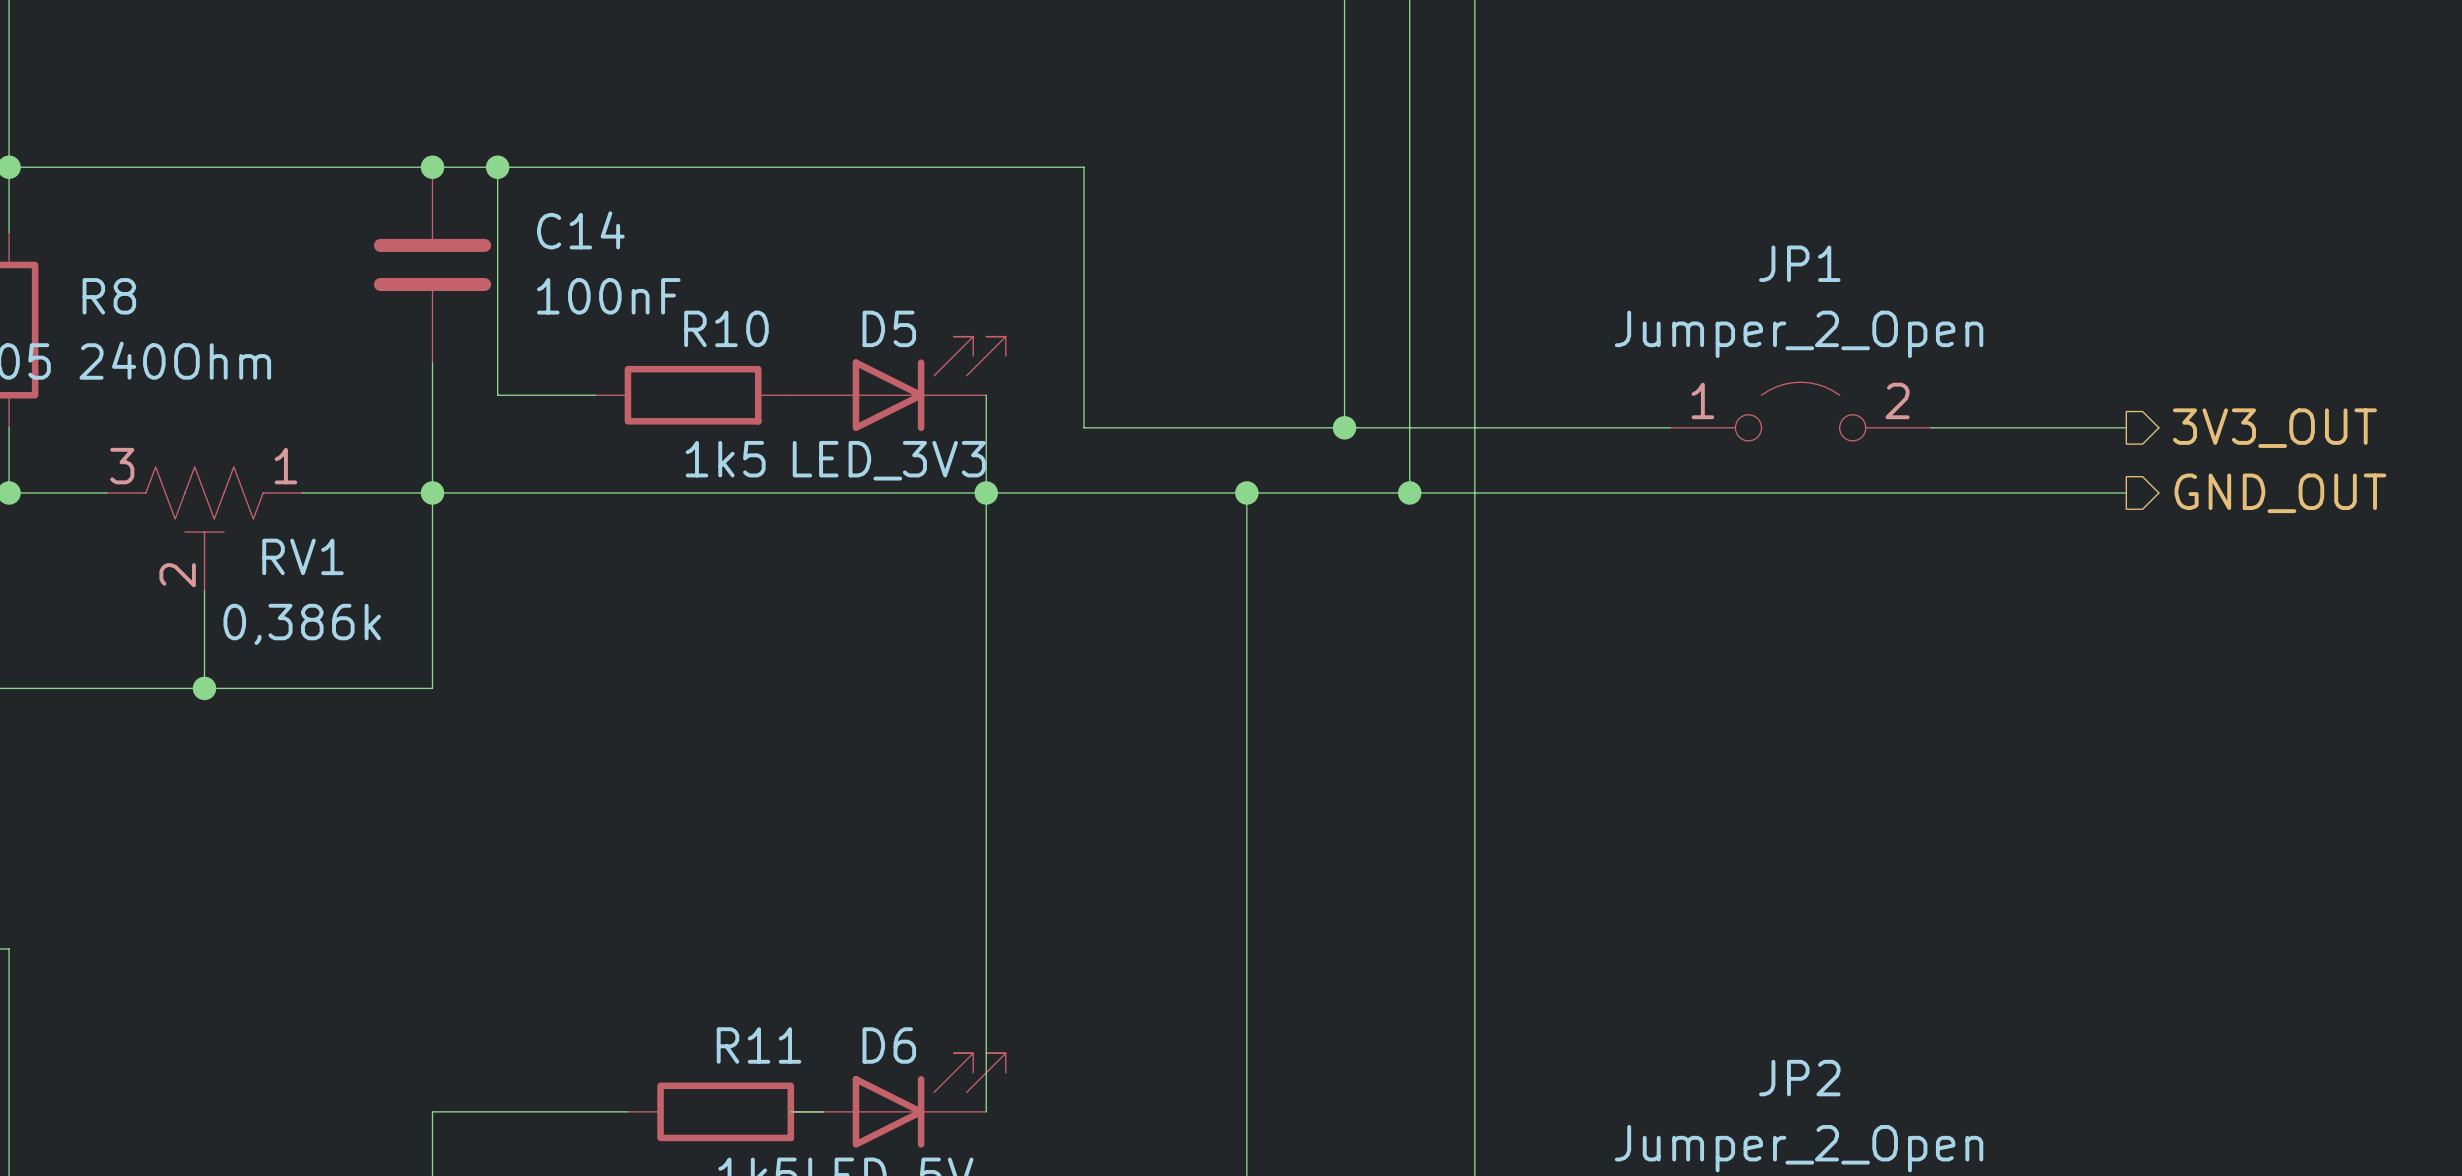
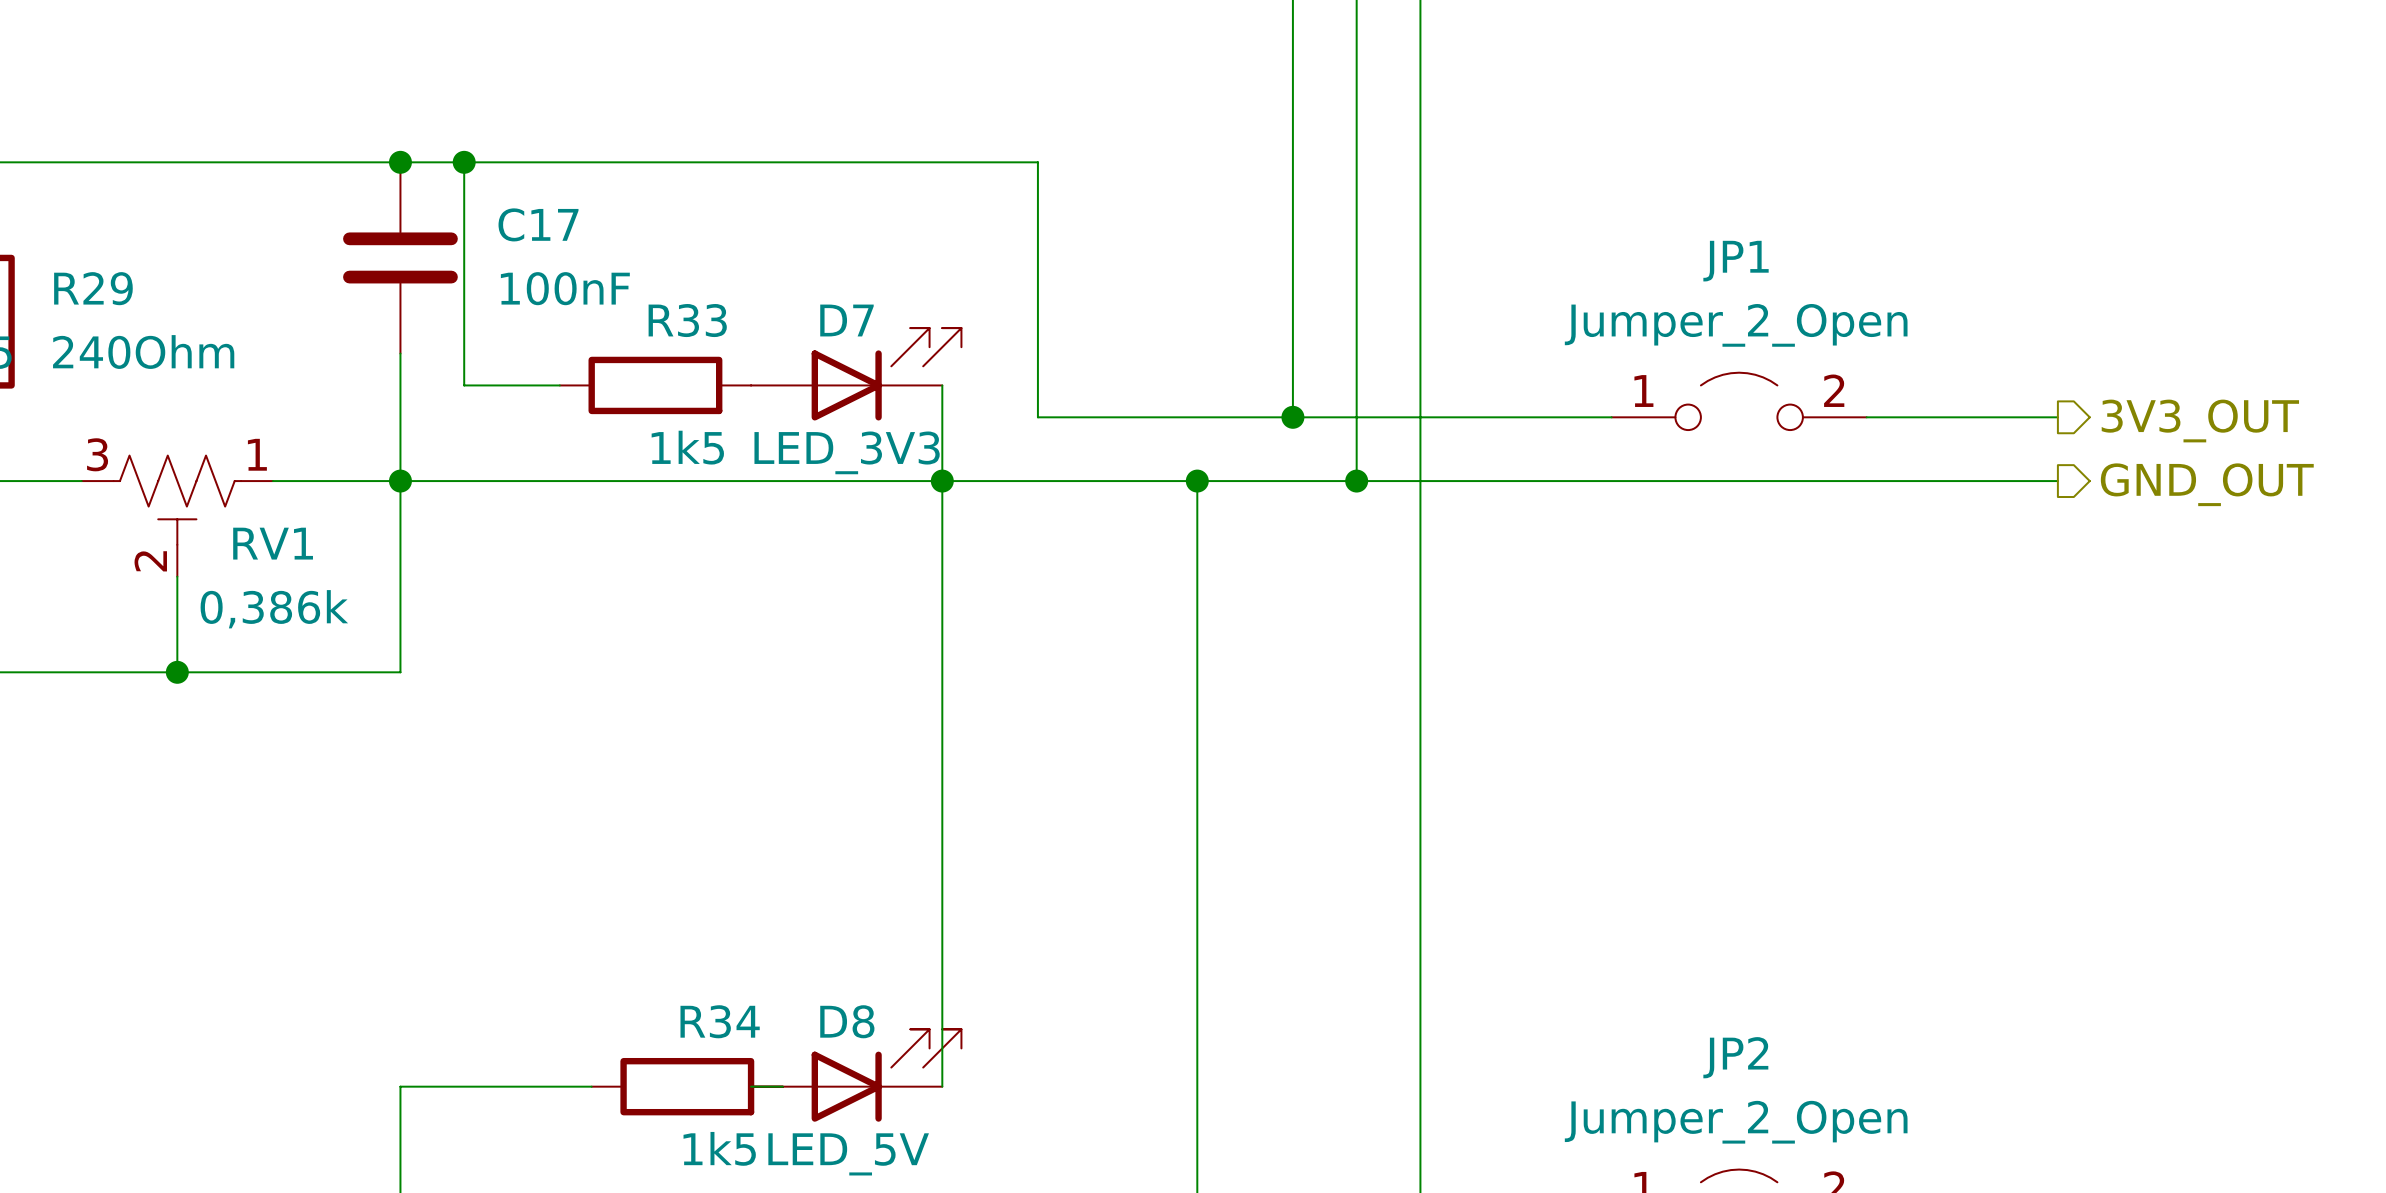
C14 name: C14 (580, 230) -> C17 (538, 224)
R8 name: R8 (109, 296) -> R29 (93, 288)
R10 name: R10 (726, 328) -> R33 (687, 320)
D5 name: D5 (889, 328) -> D7 (846, 320)
R11 name: R11 (759, 1045) -> R34 (720, 1021)
D6 name: D6 (889, 1045) -> D8 (847, 1021)

